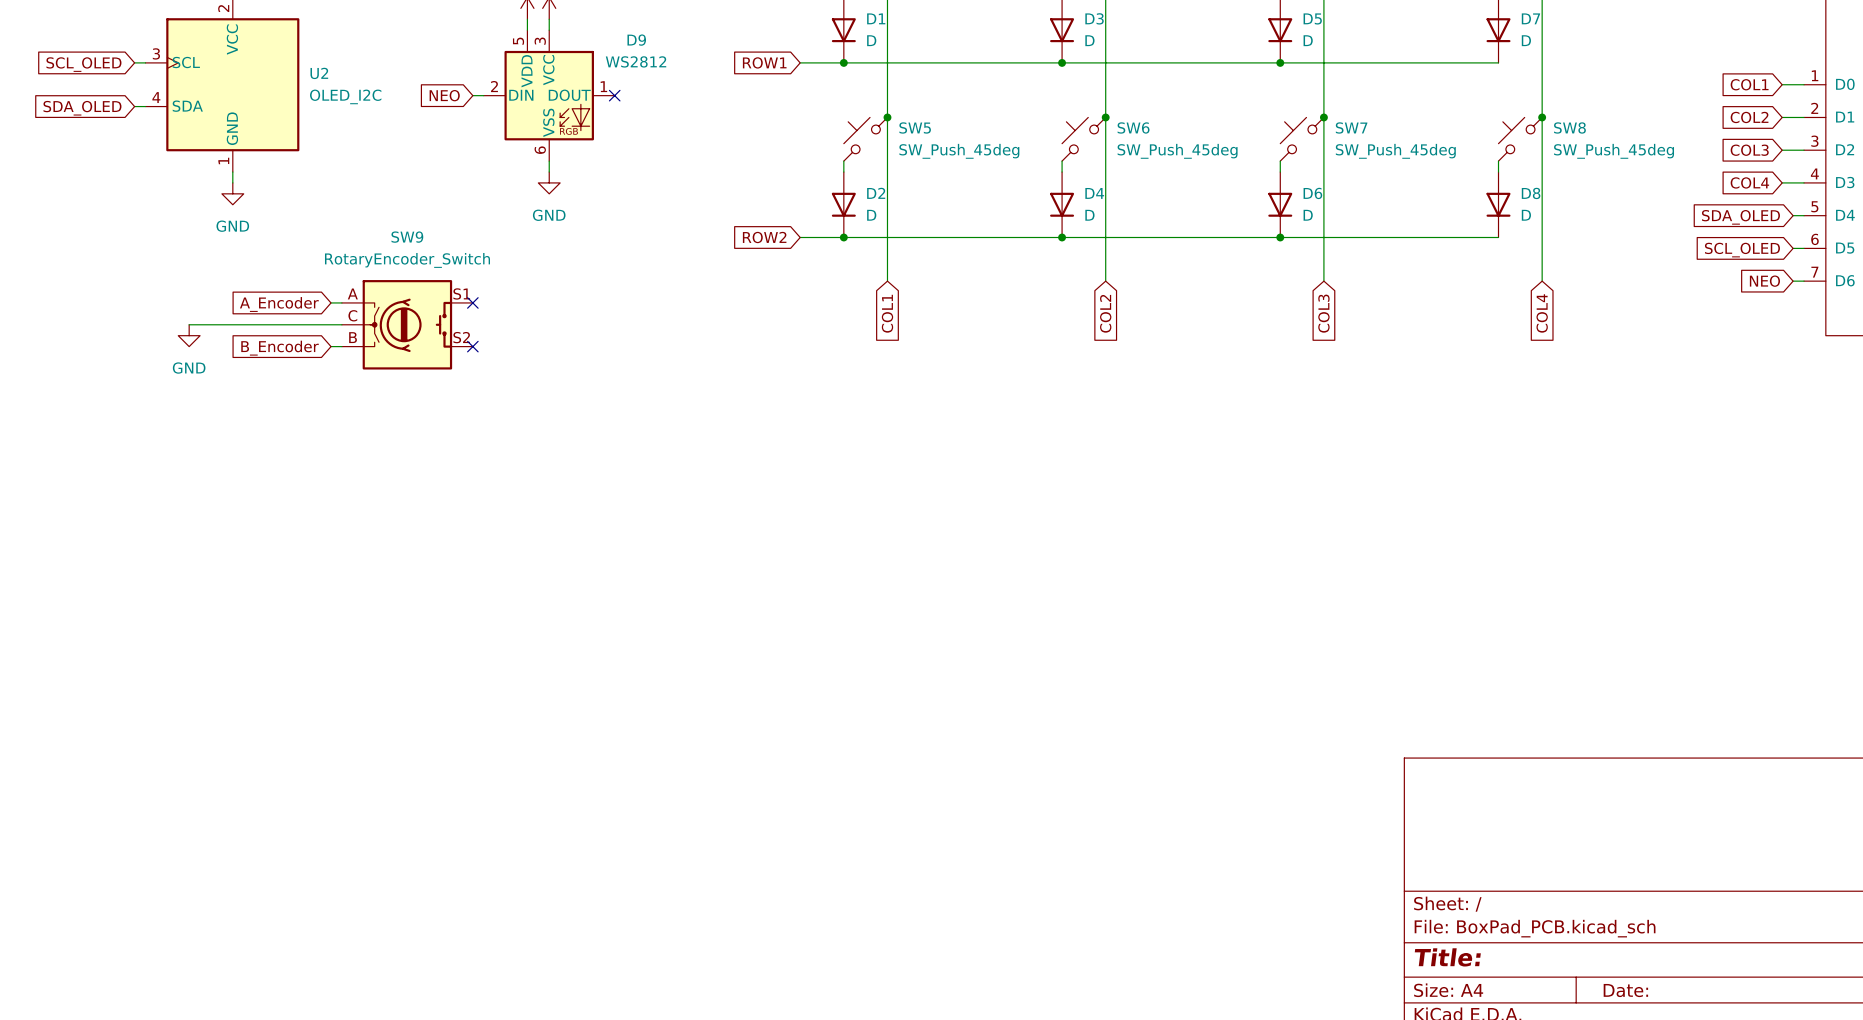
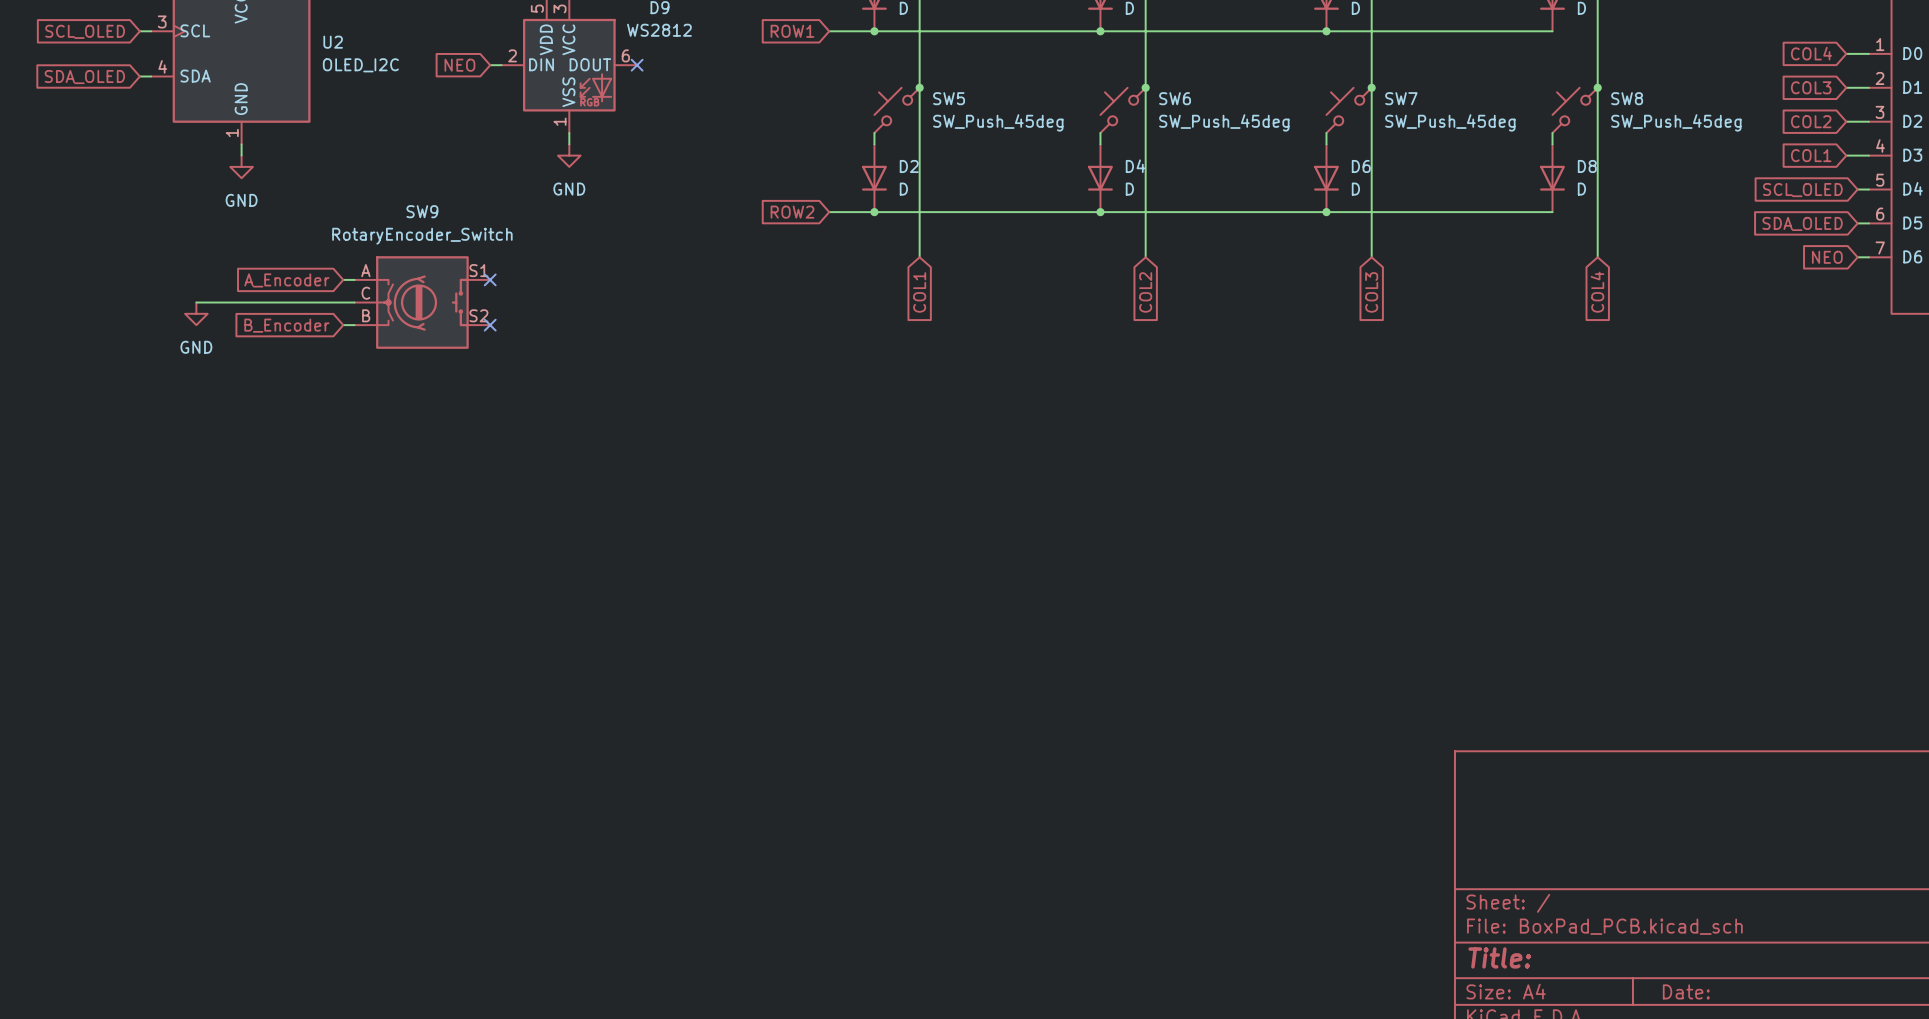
global label: COL1 (1749, 84) -> COL4 (1811, 53)
D9 pin number: 1 (603, 86) -> 6 (625, 55)
global label: COL2 (1749, 117) -> COL3 (1811, 87)
D9 pin number: 6 (540, 150) -> 1 (560, 121)
global label: COL3 (1749, 150) -> COL2 (1811, 121)
global label: COL4 (1749, 182) -> COL1 (1811, 155)
global label: SDA_OLED (1740, 217) -> SCL_OLED (1802, 190)
global label: SCL_OLED (1742, 250) -> SDA_OLED (1802, 223)

